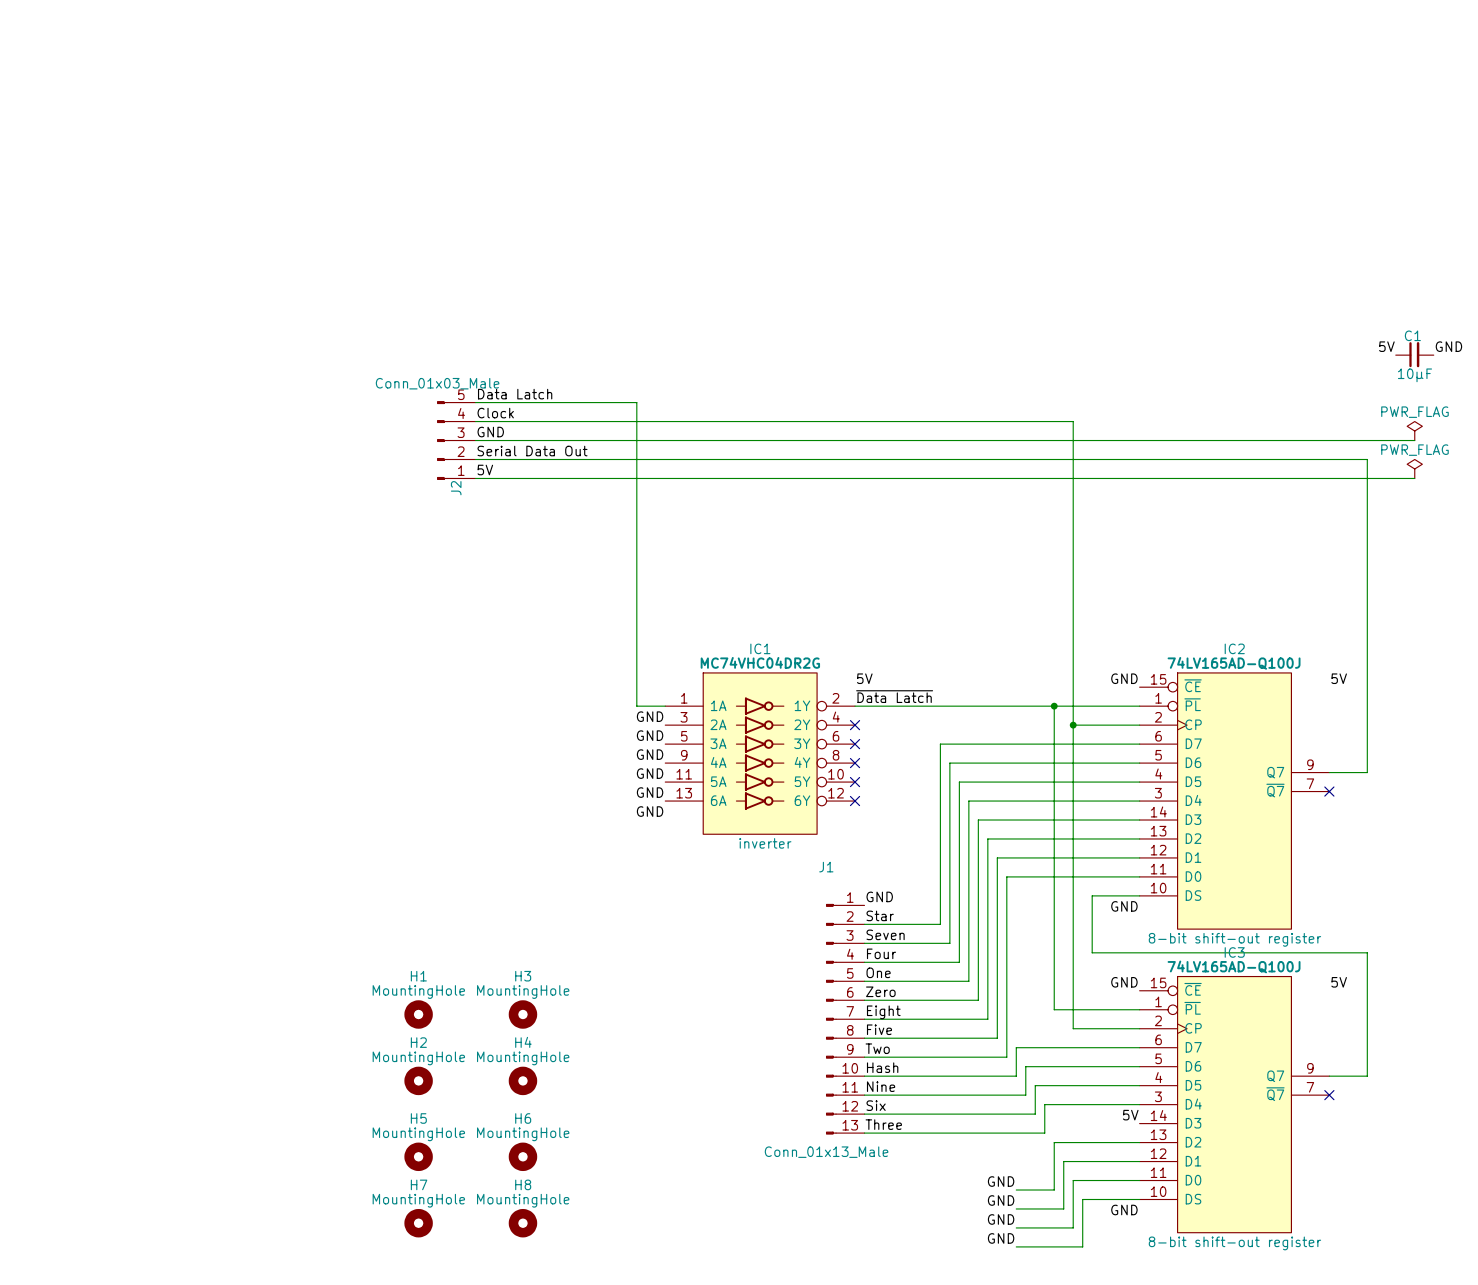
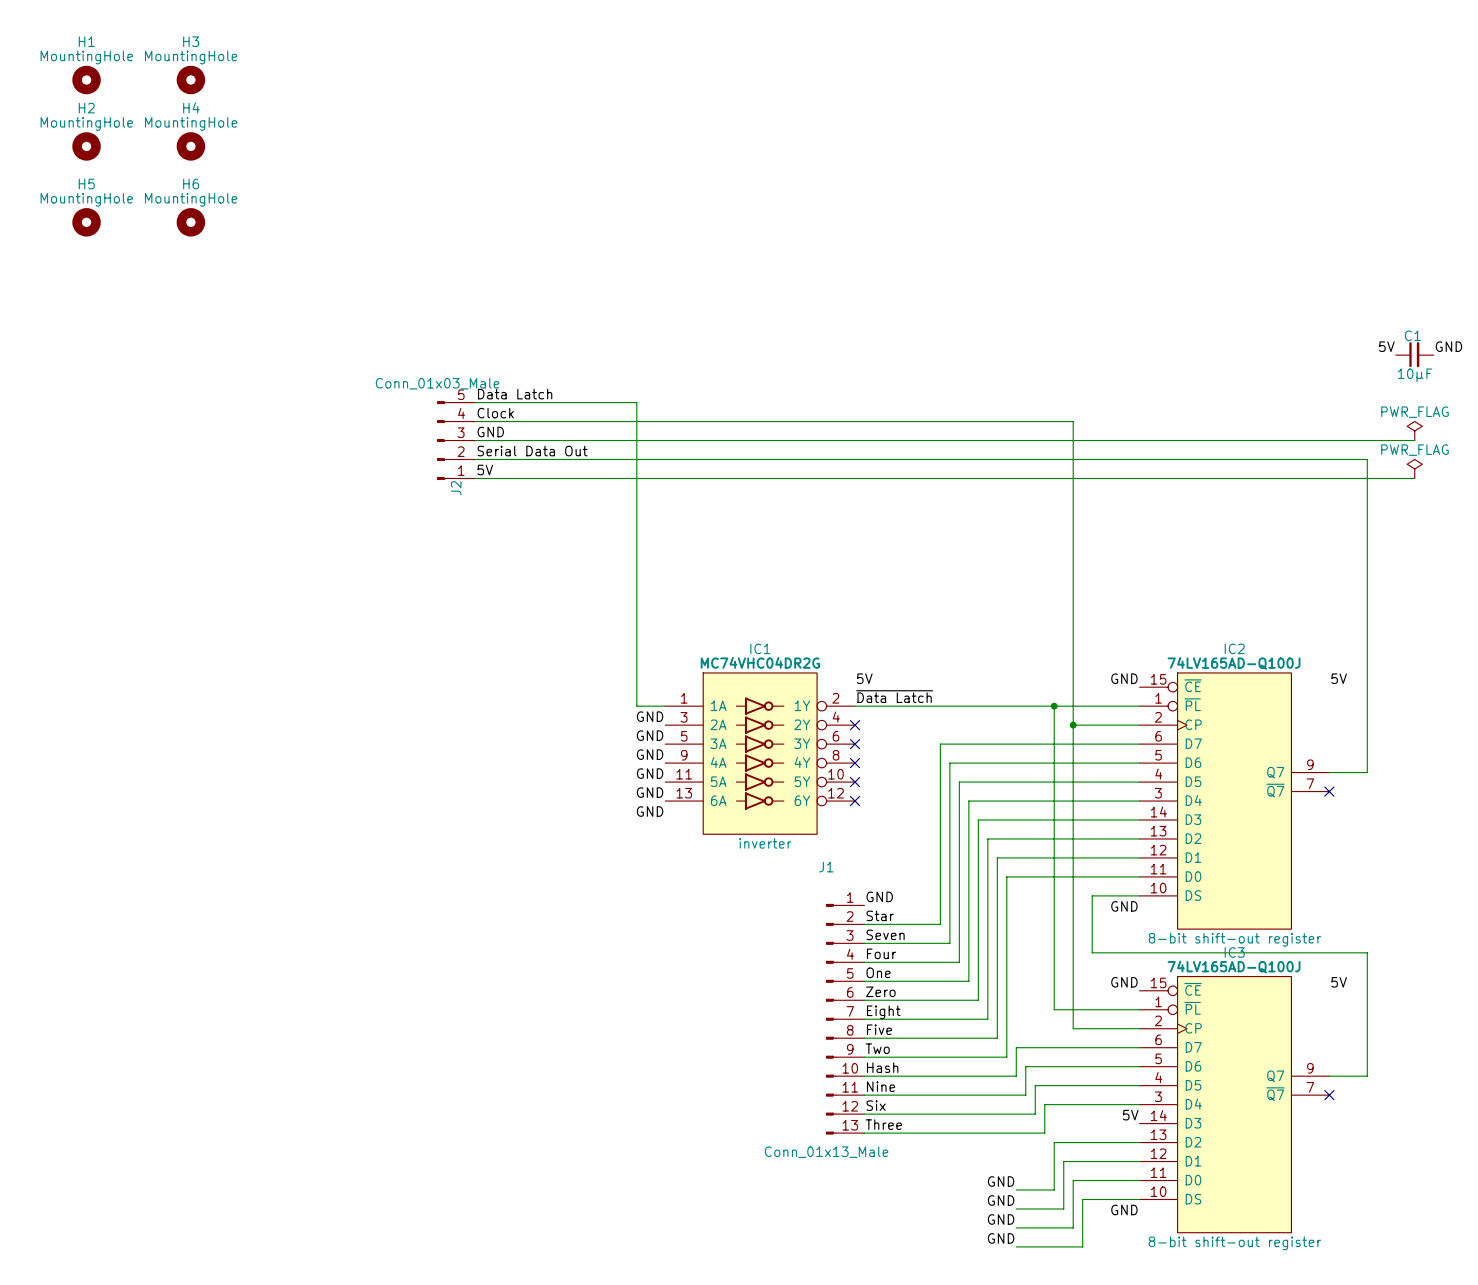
H1 position: (418, 1014) -> (86, 80)
H3 position: (522, 1014) -> (190, 80)
H2 position: (418, 1080) -> (86, 146)
H4 position: (522, 1080) -> (190, 146)
H5 position: (418, 1156) -> (86, 222)
H6 position: (522, 1156) -> (190, 222)
H7: MountingHole (418, 1223) -> none
H8: MountingHole (522, 1223) -> none

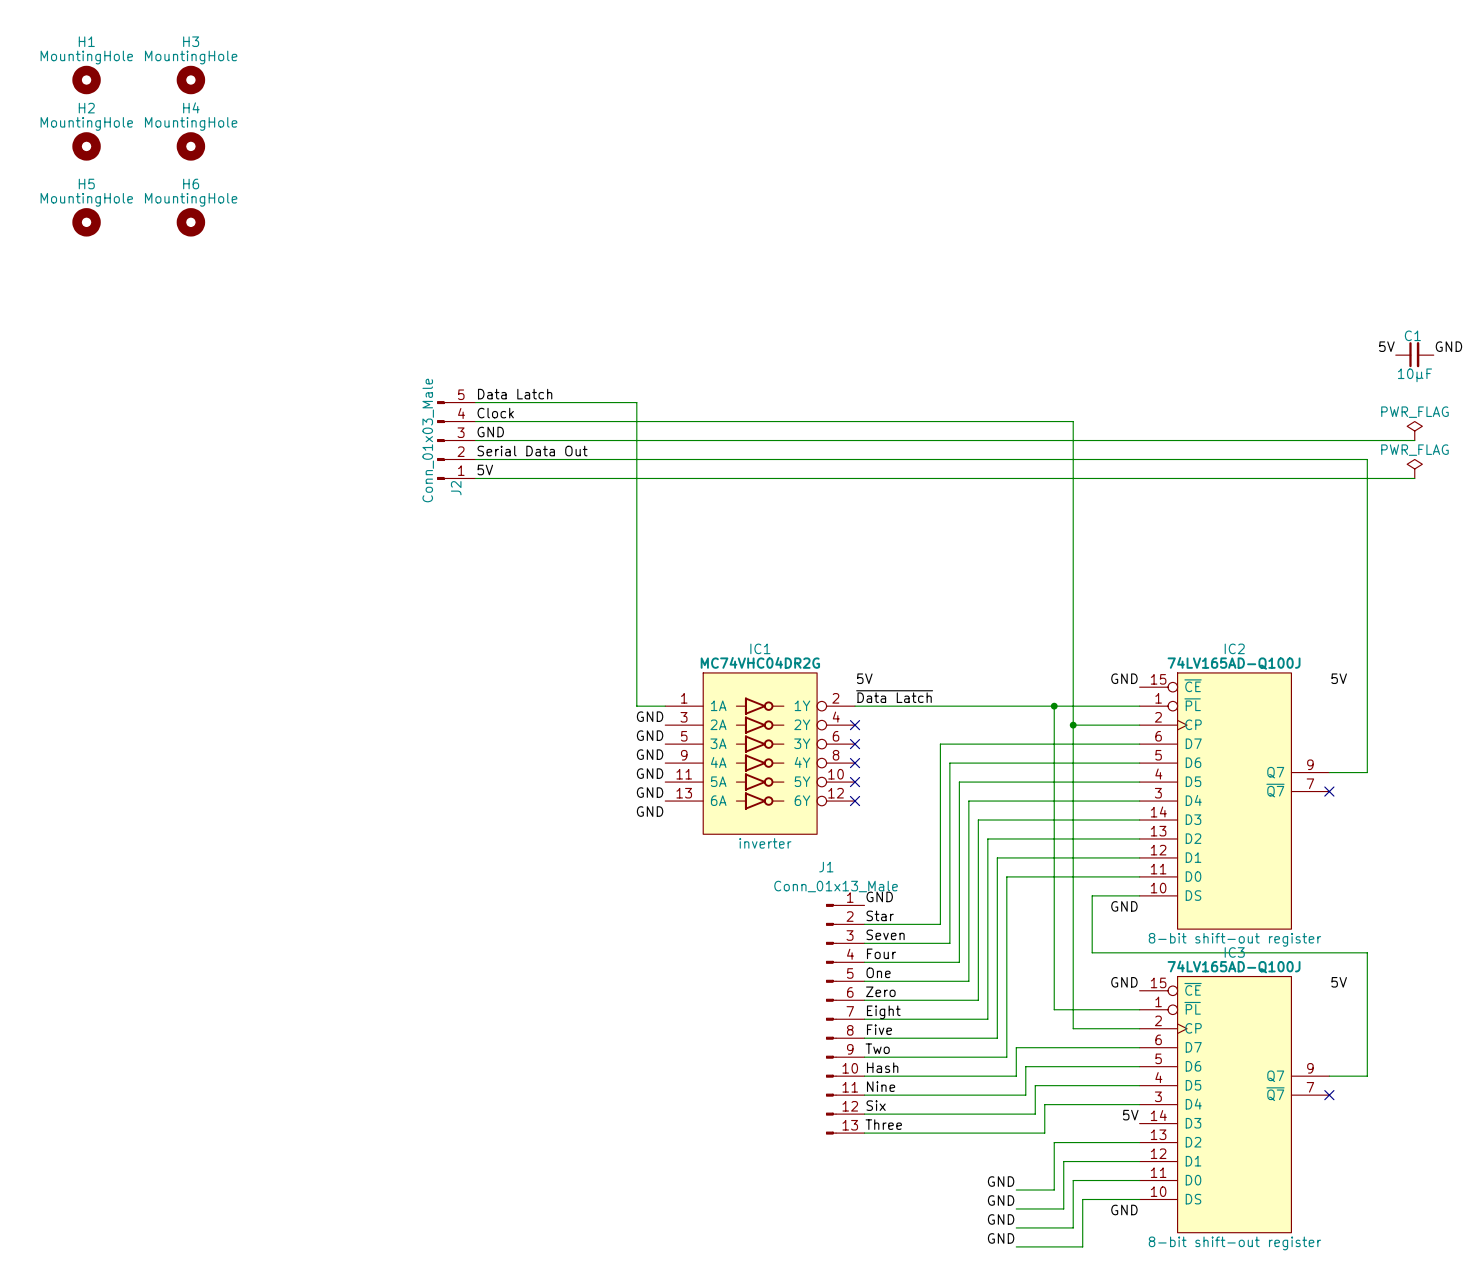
J2 value rotation: 0° (437, 383) -> 90° counterclockwise (428, 440)
J1 value position: Conn_01x13_Male (826, 1152) -> Conn_01x13_Male (836, 886)

